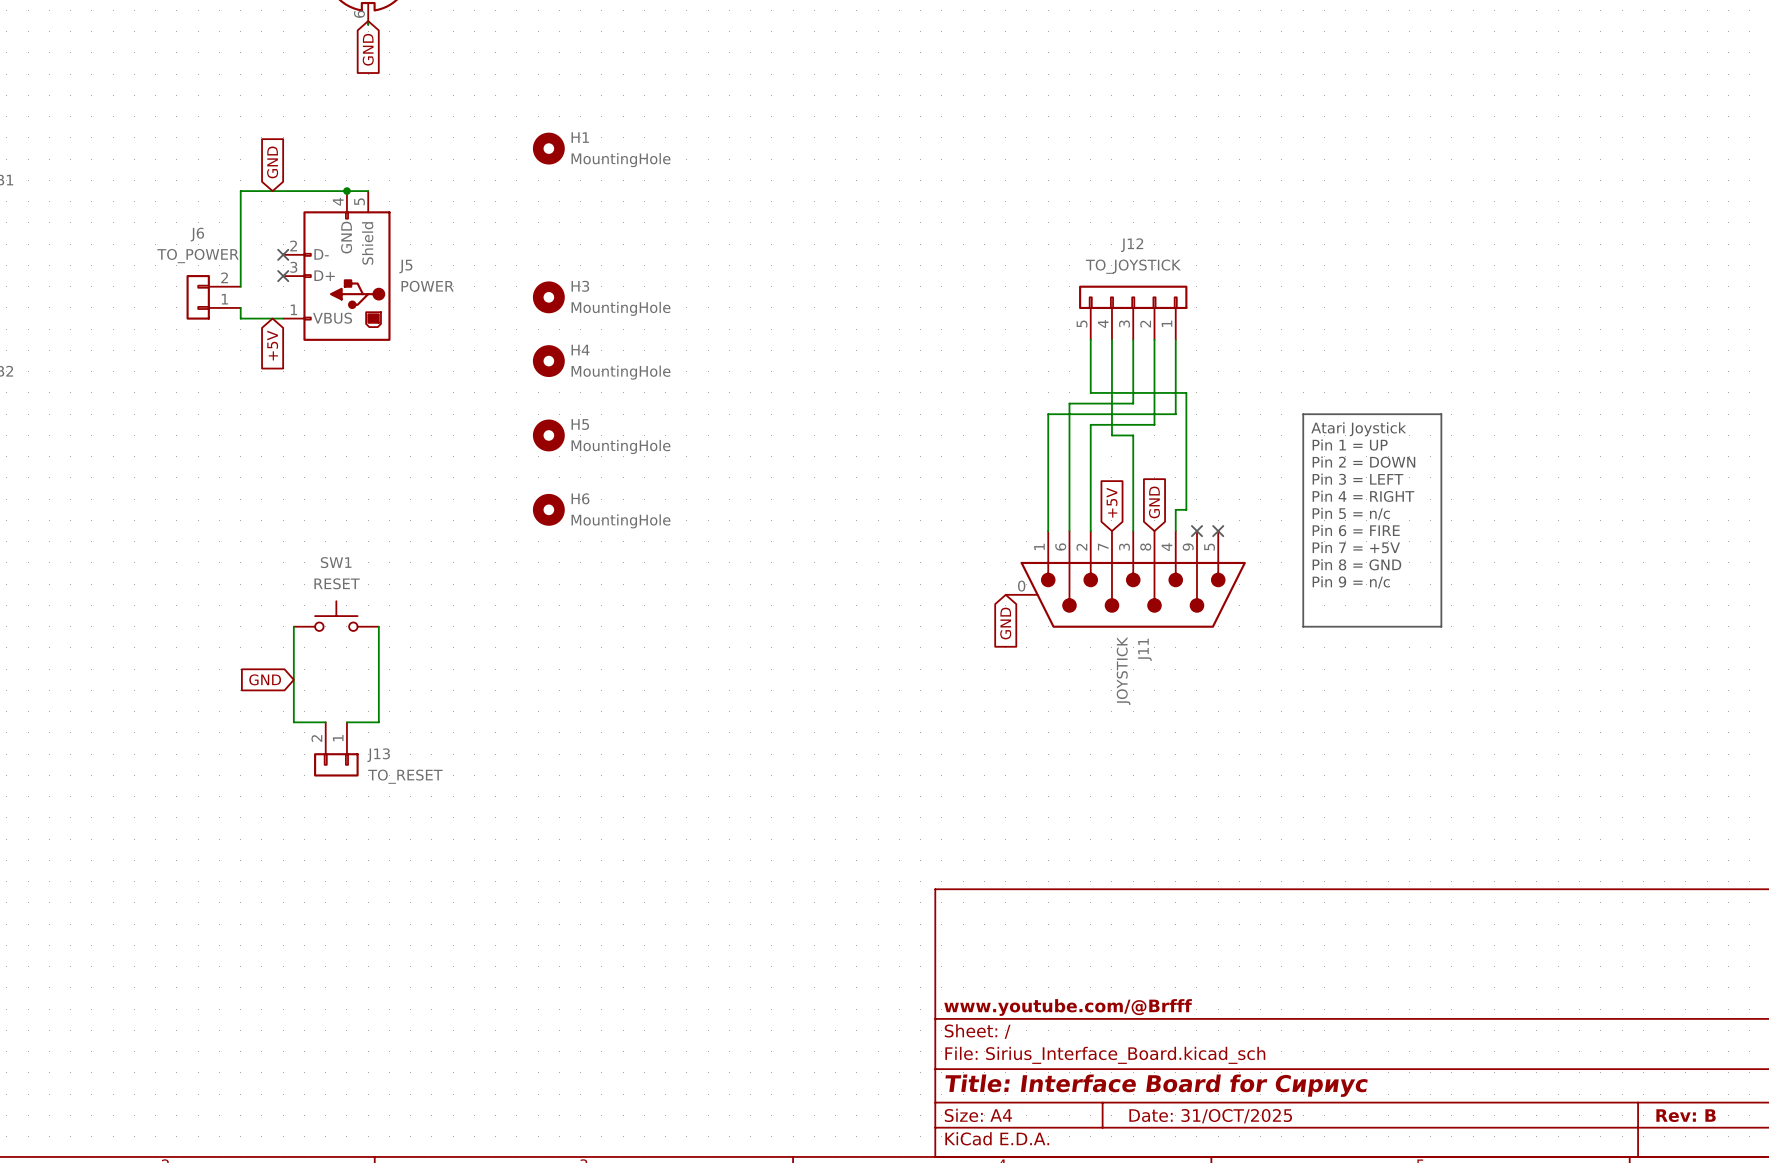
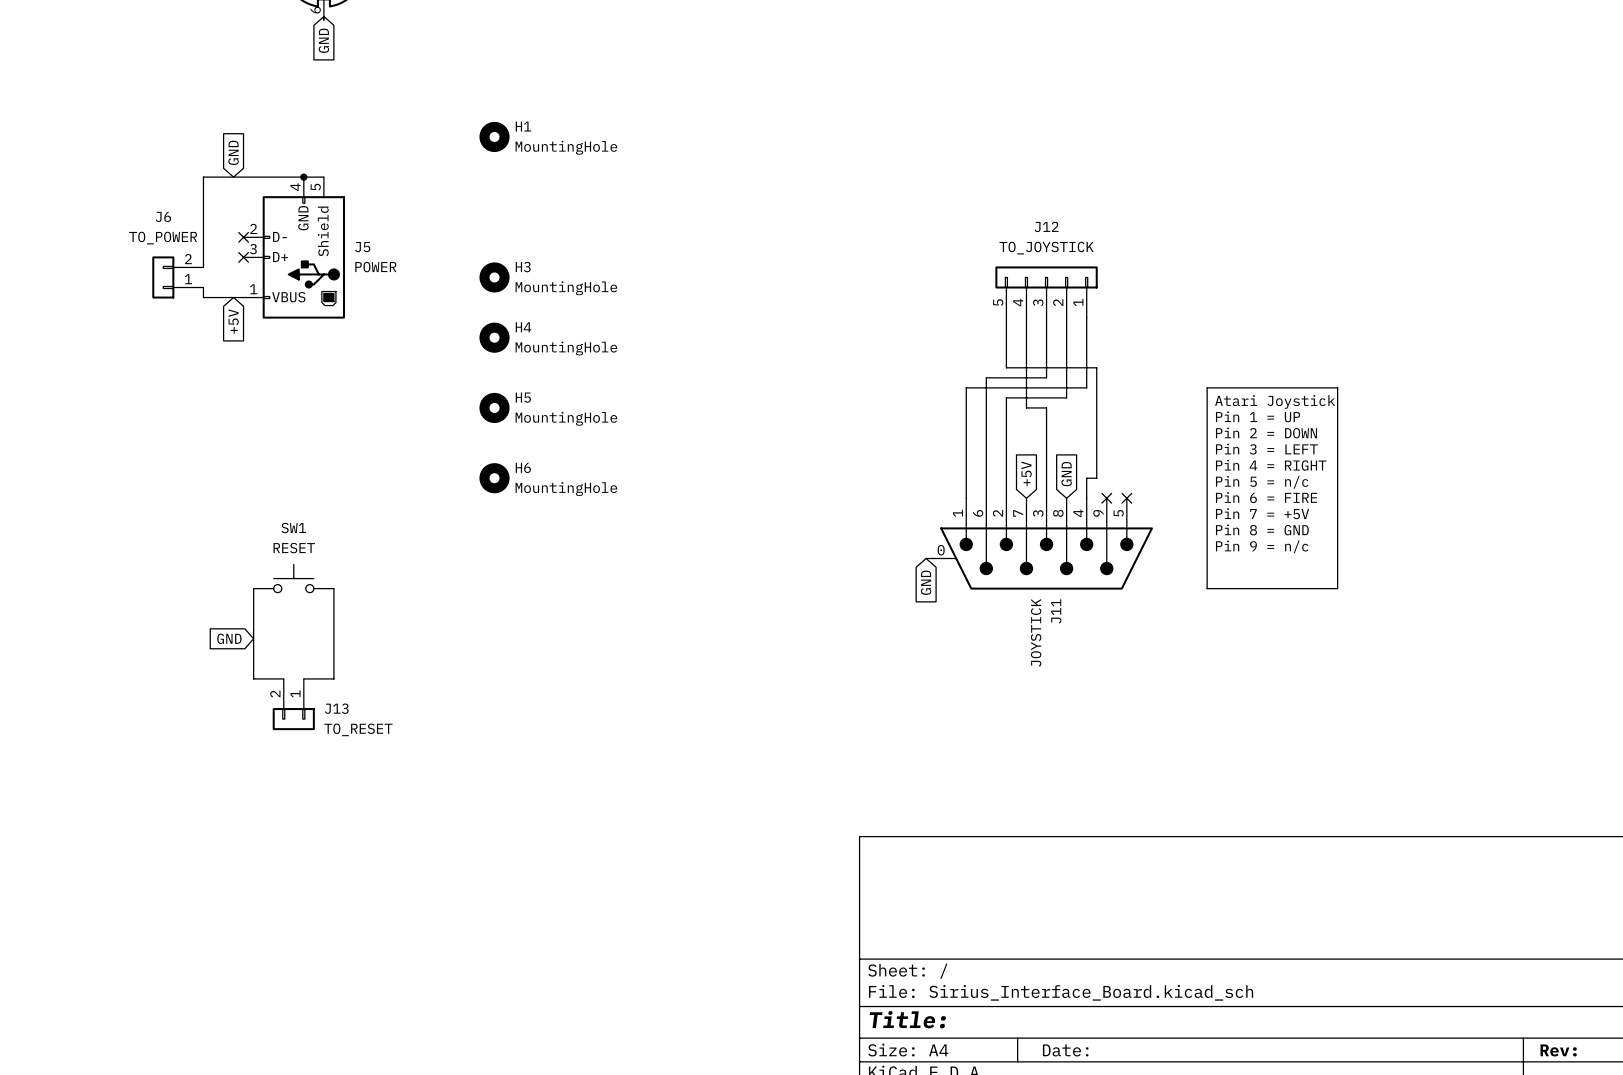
title block: www.youtube.com/@Brfff (1068, 1007) -> none
title block: Title: Interface Board for Сириус (1156, 1085) -> Title: (907, 1019)
title block: Rev: B (1686, 1115) -> Rev: (1558, 1050)
title block: Date: 31/OCT/2025 (1210, 1116) -> Date: (1065, 1050)

